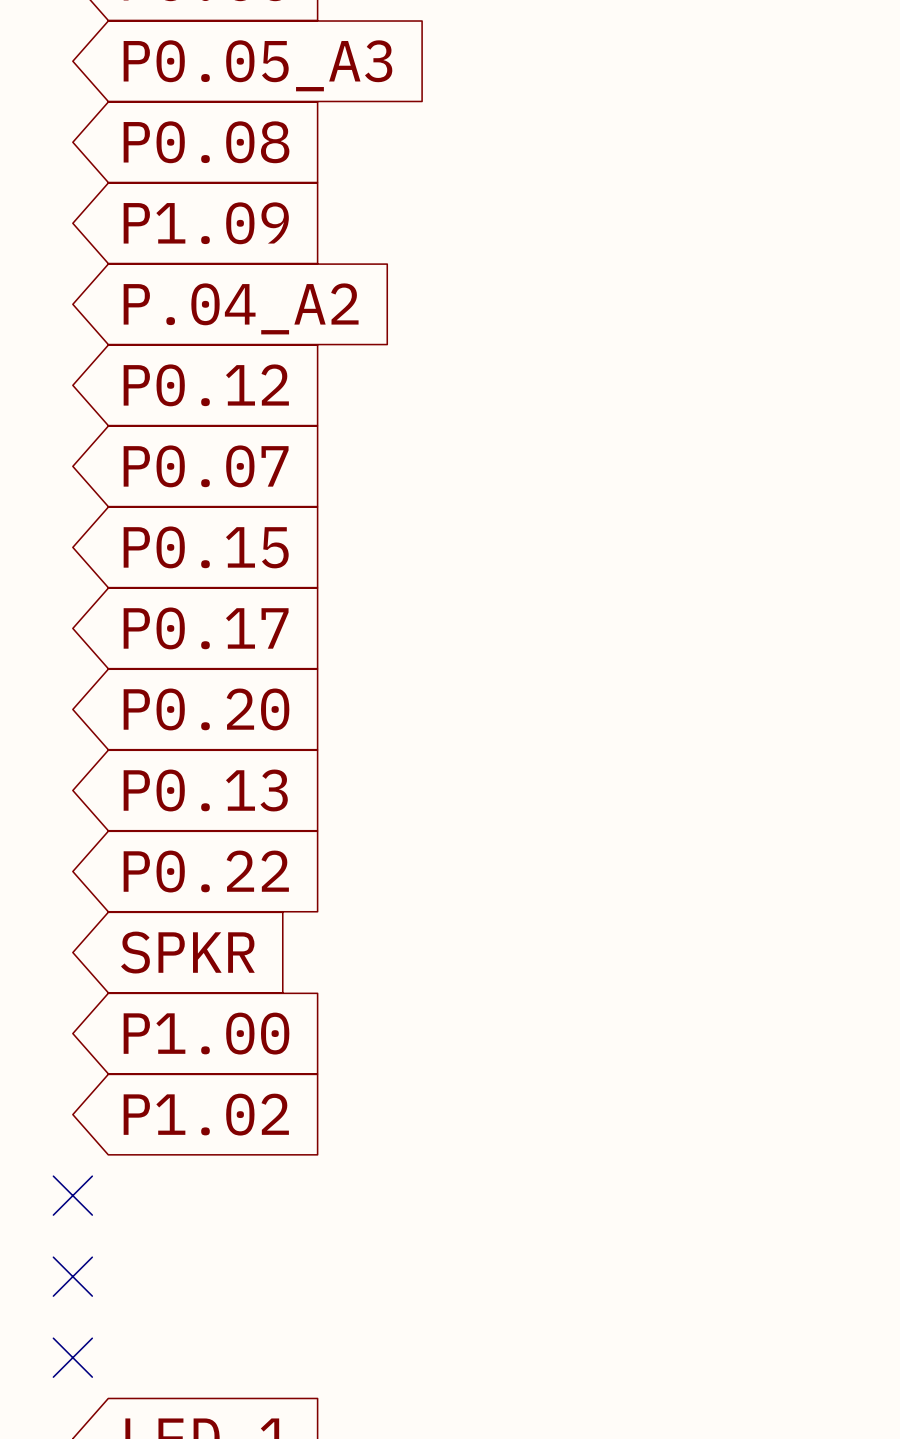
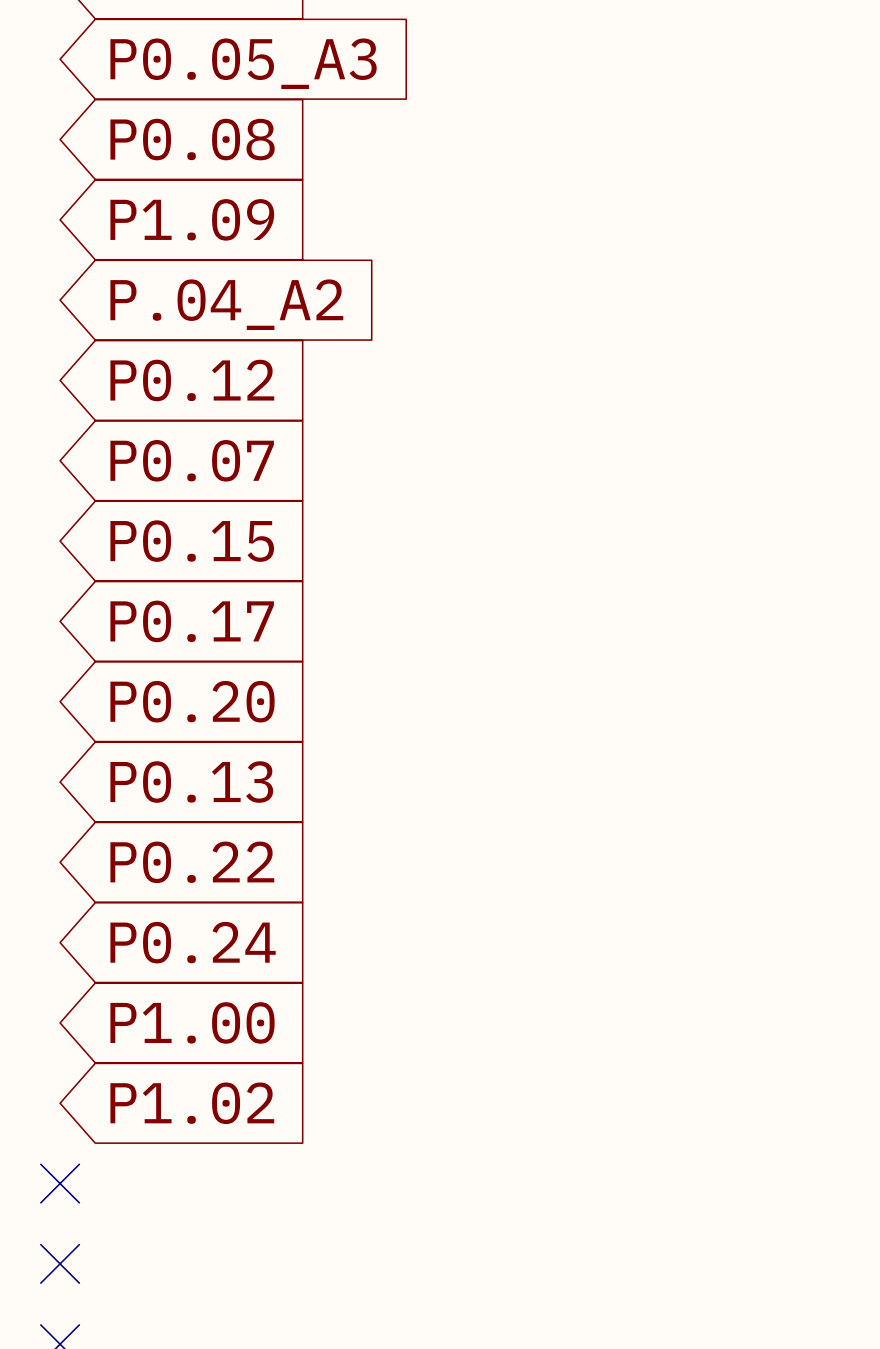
global label: SPKR (187, 952) -> P0.24 (193, 942)

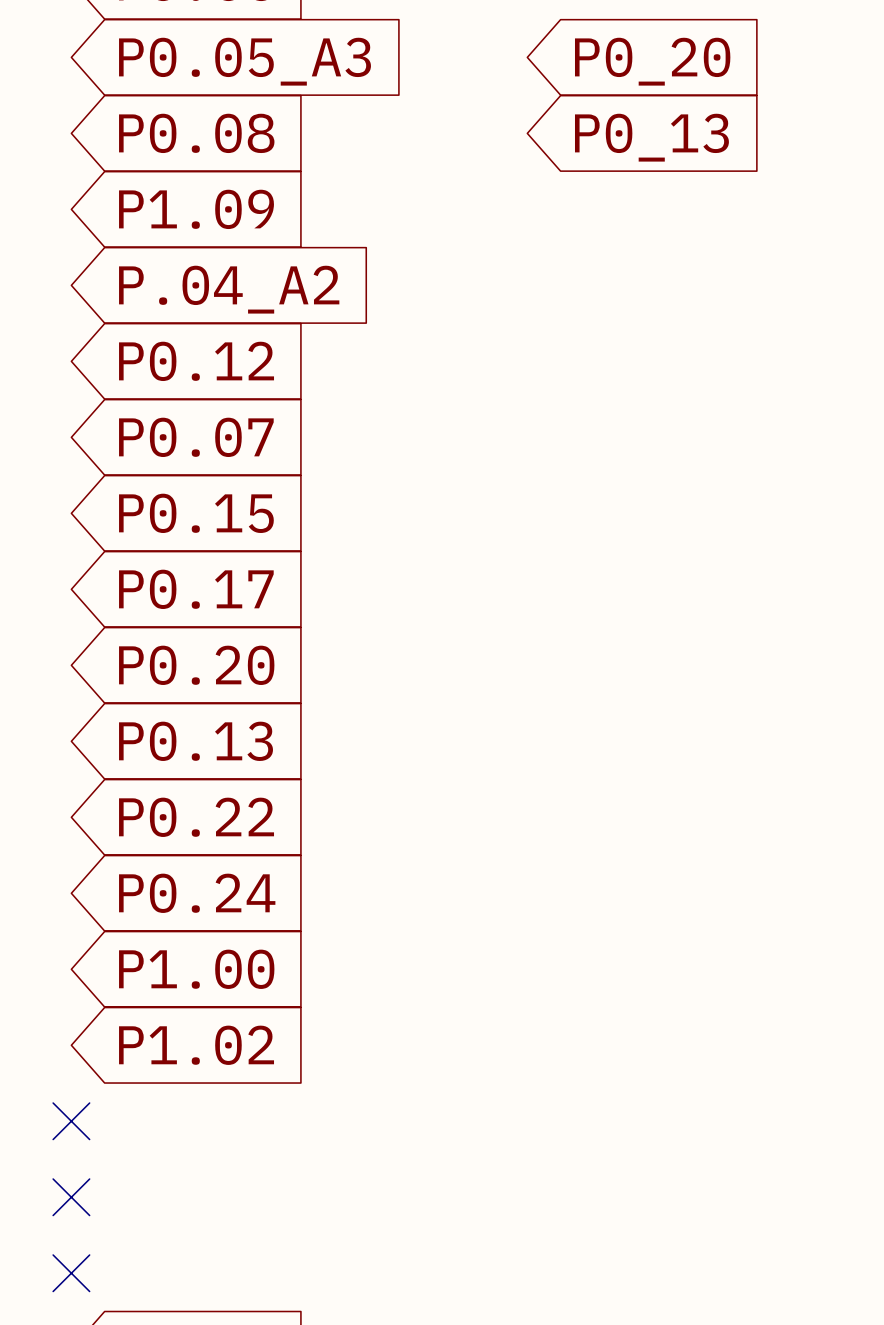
global label: none -> P0_20 (652, 61)
global label: none -> P0_13 (651, 137)

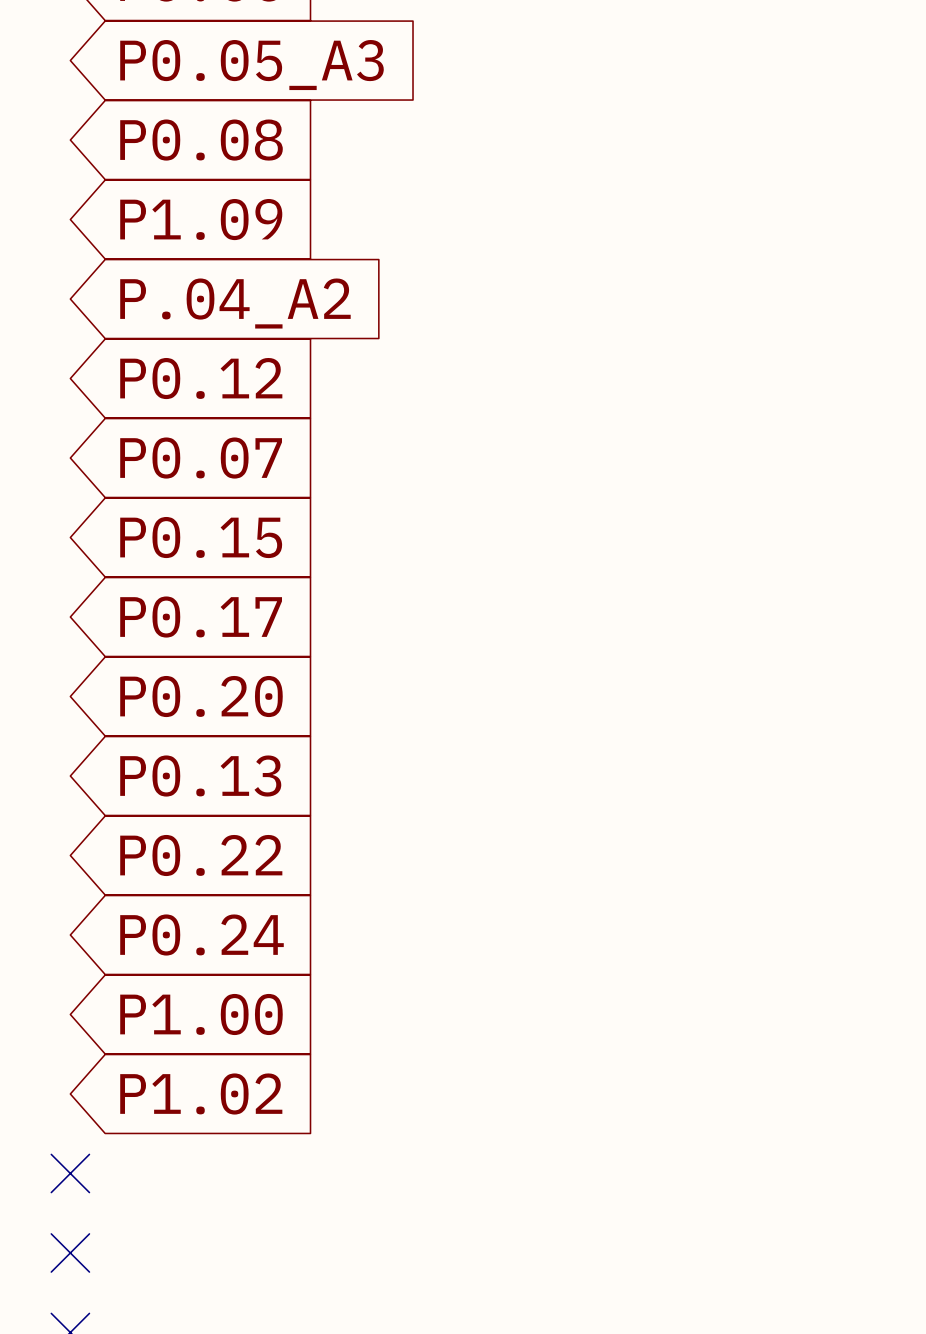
global label: P0_20 (652, 61) -> none
global label: P0_13 (651, 137) -> none

